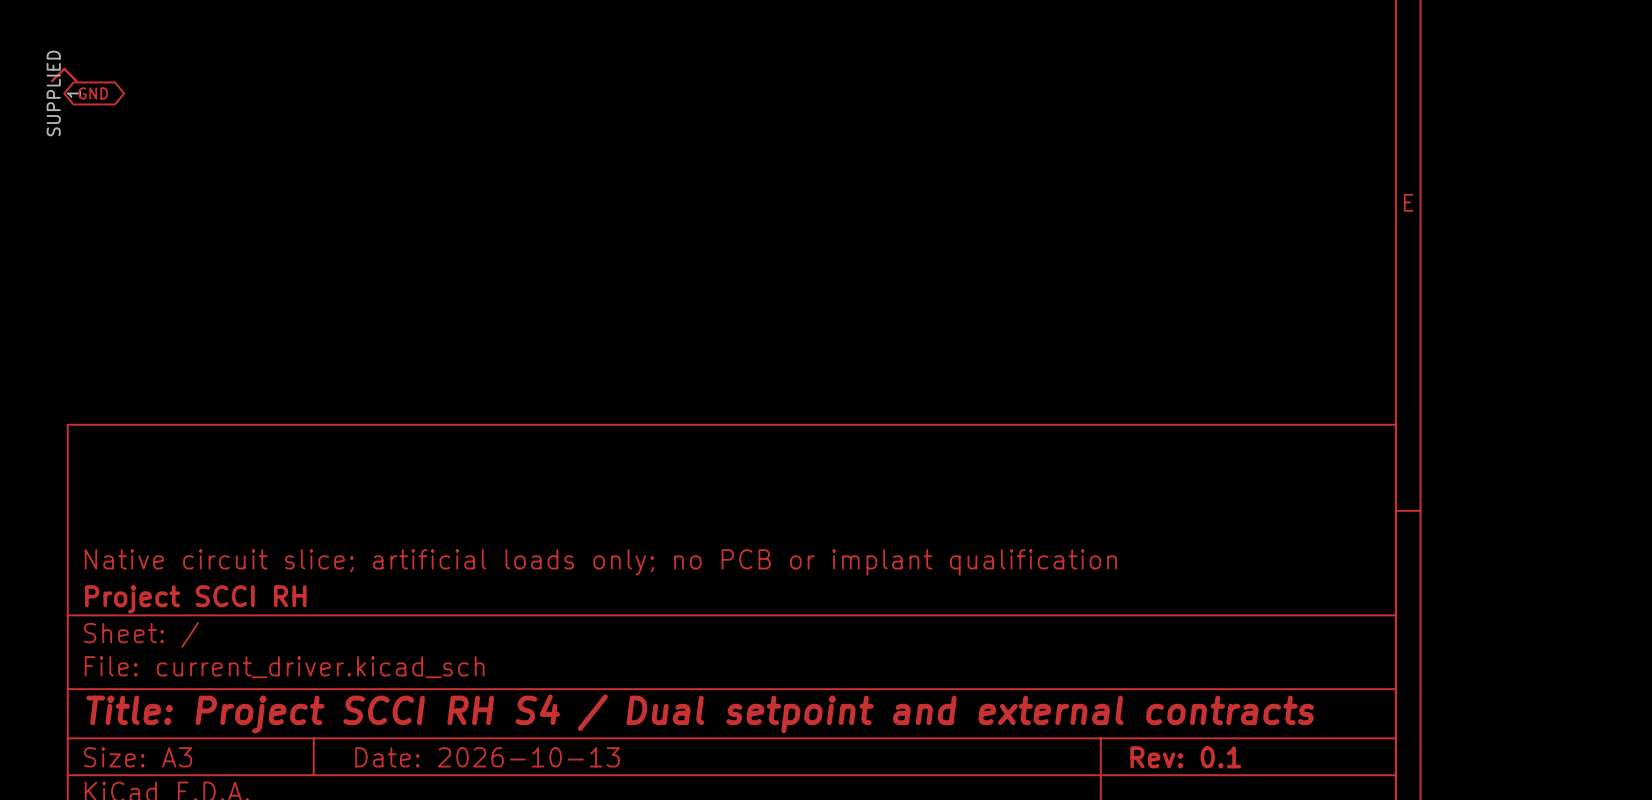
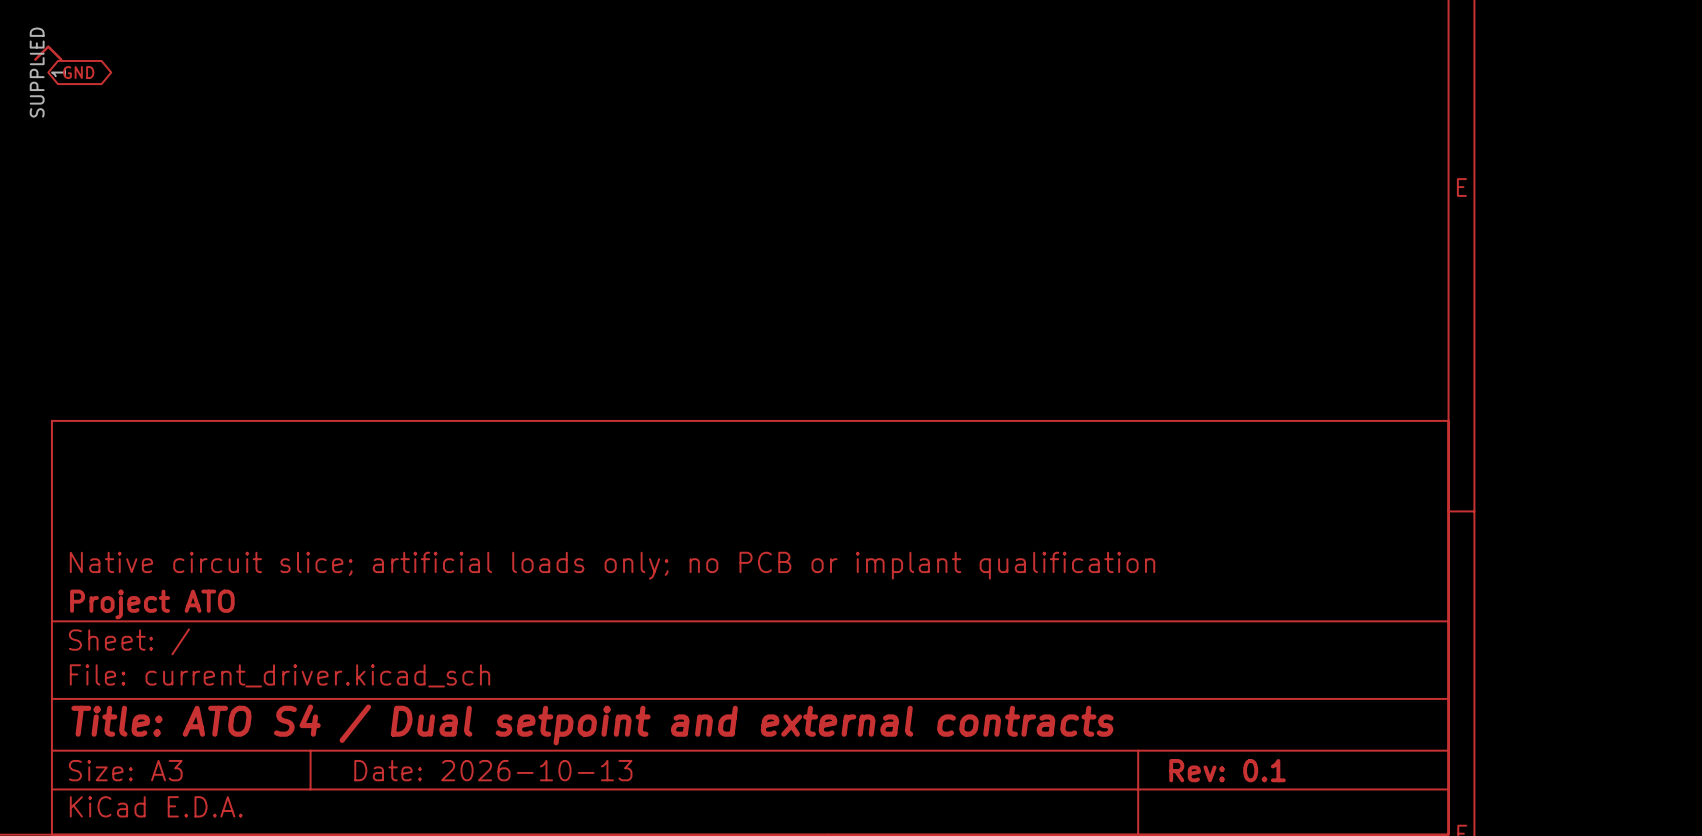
title block: Project SCCI RH (195, 599) -> Project ATO (152, 604)
title block: Title: Project SCCI RH S4 / Dual setpoint and external contracts (700, 713) -> Title: ATO S4 / Dual setpoint and external contracts (592, 724)

